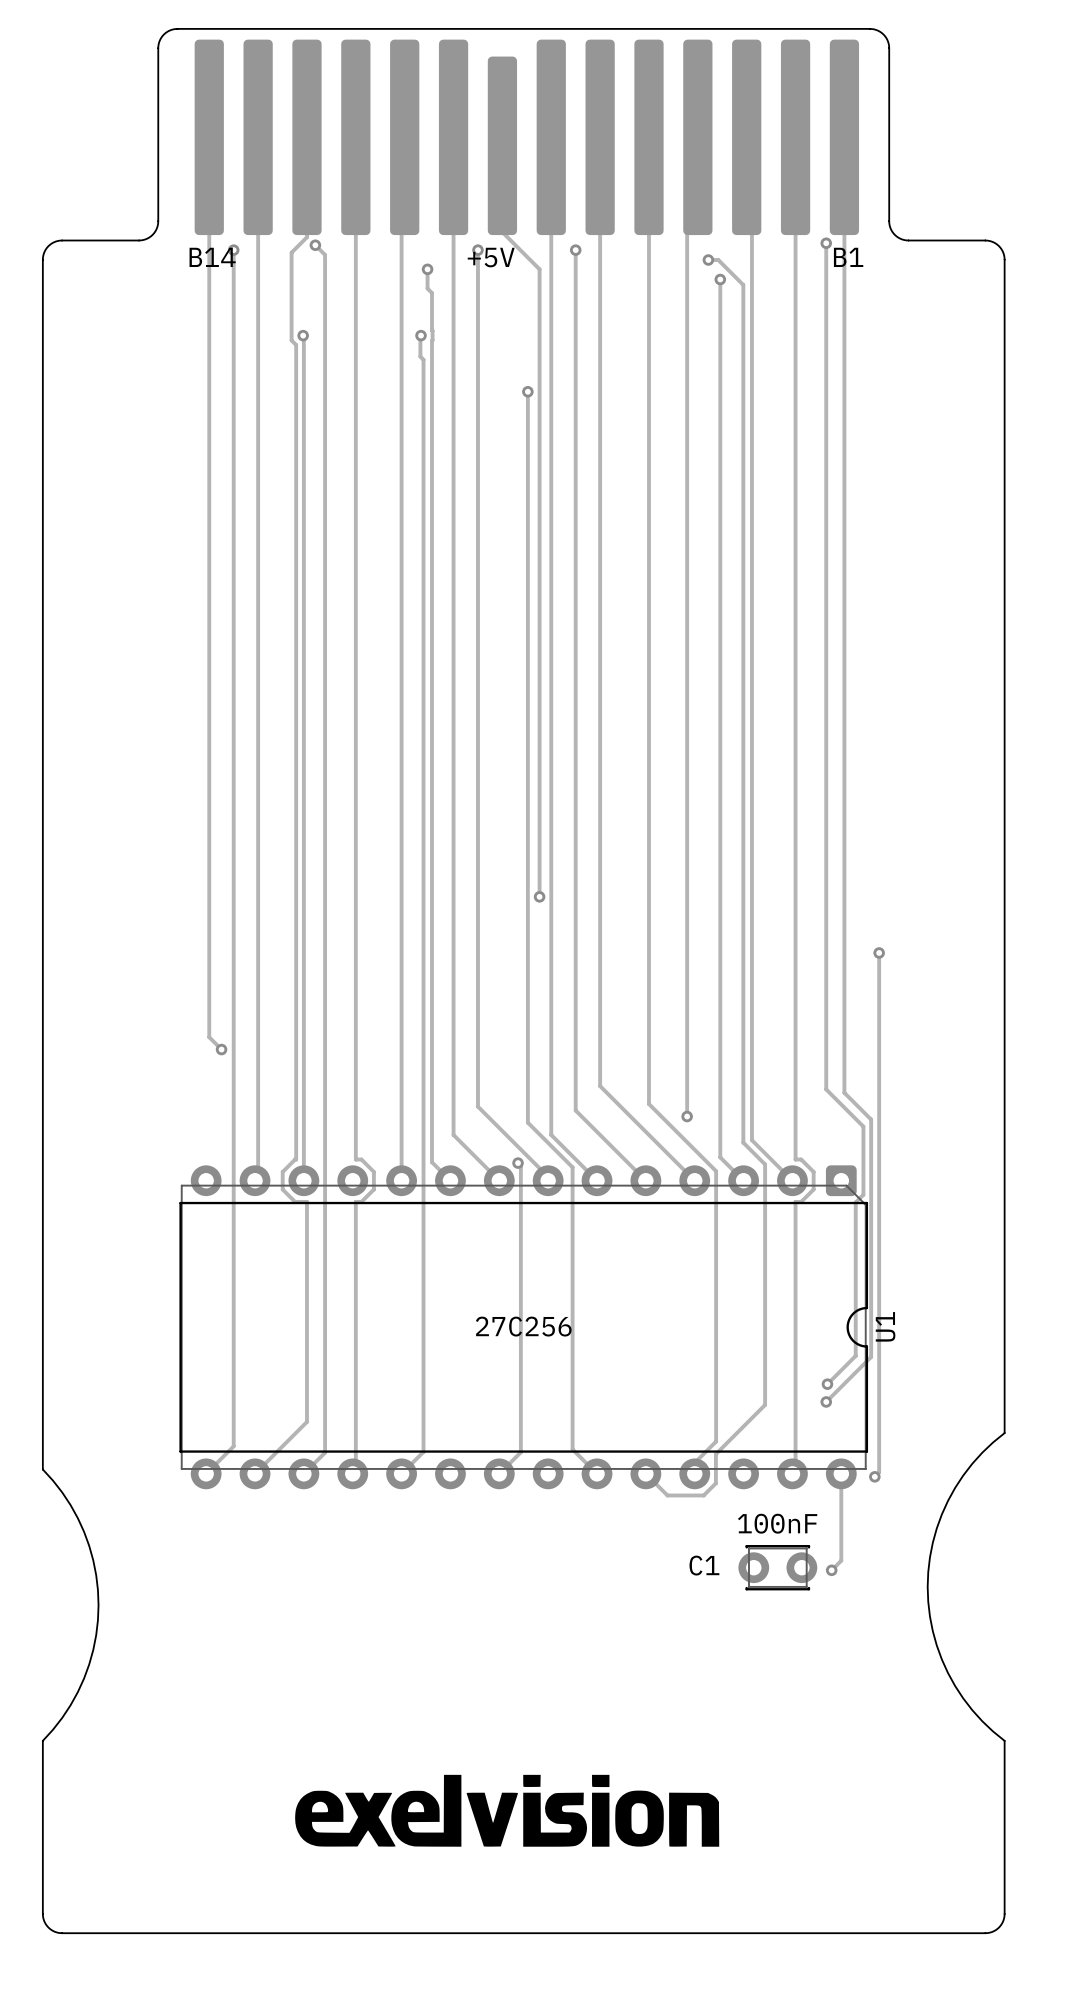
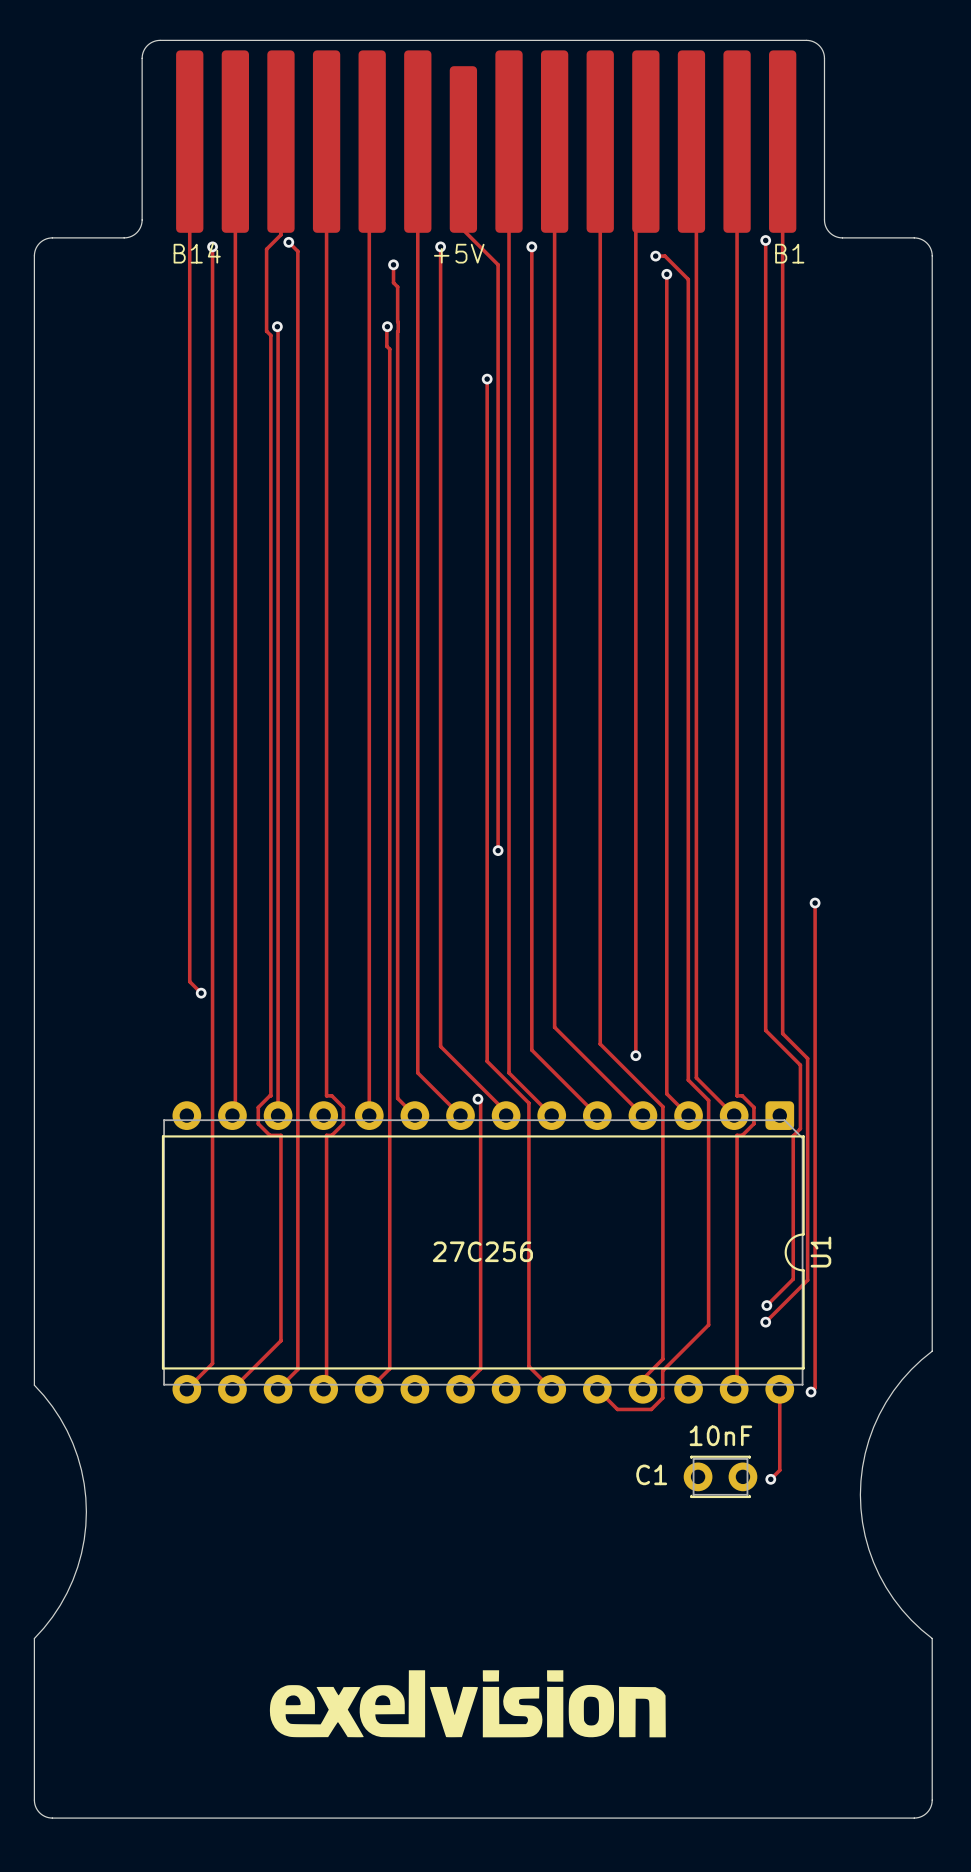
C1 value: 100nF (777, 1523) -> 10nF (720, 1435)

